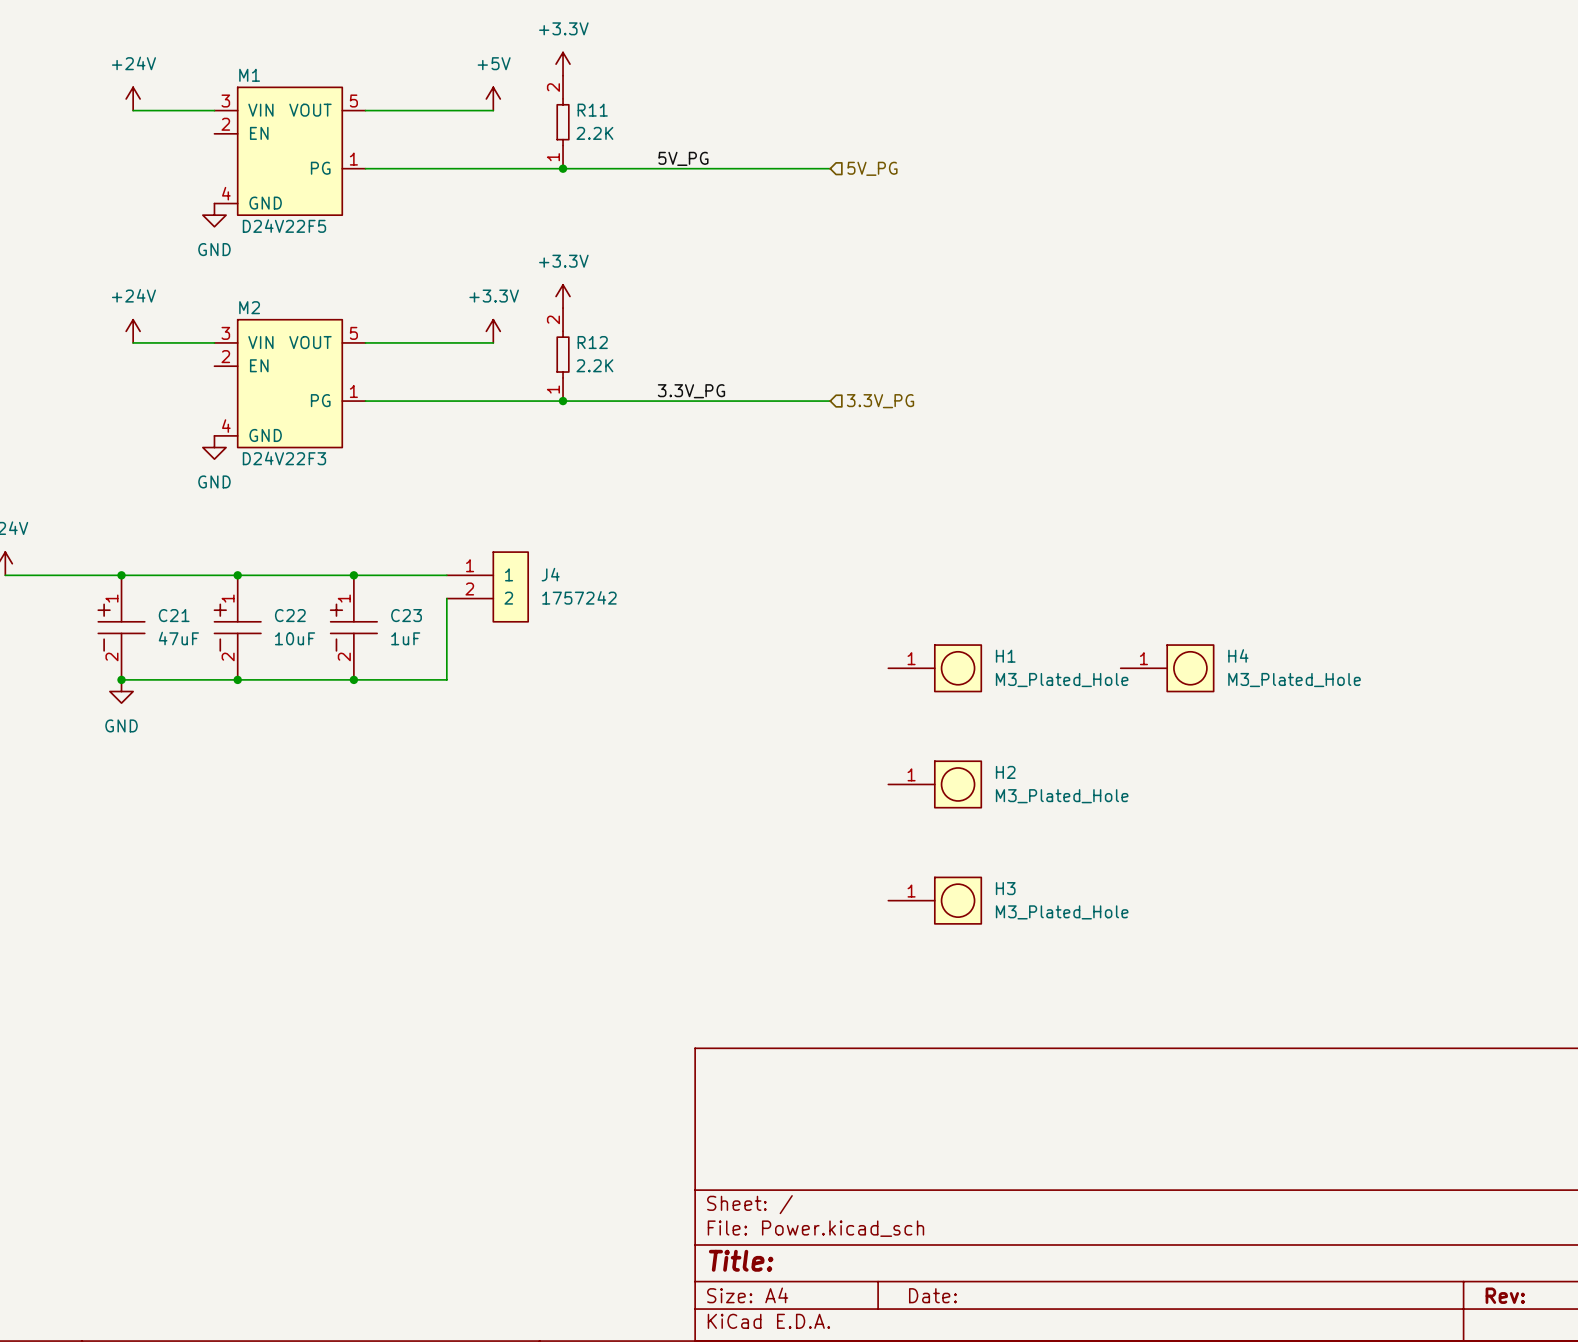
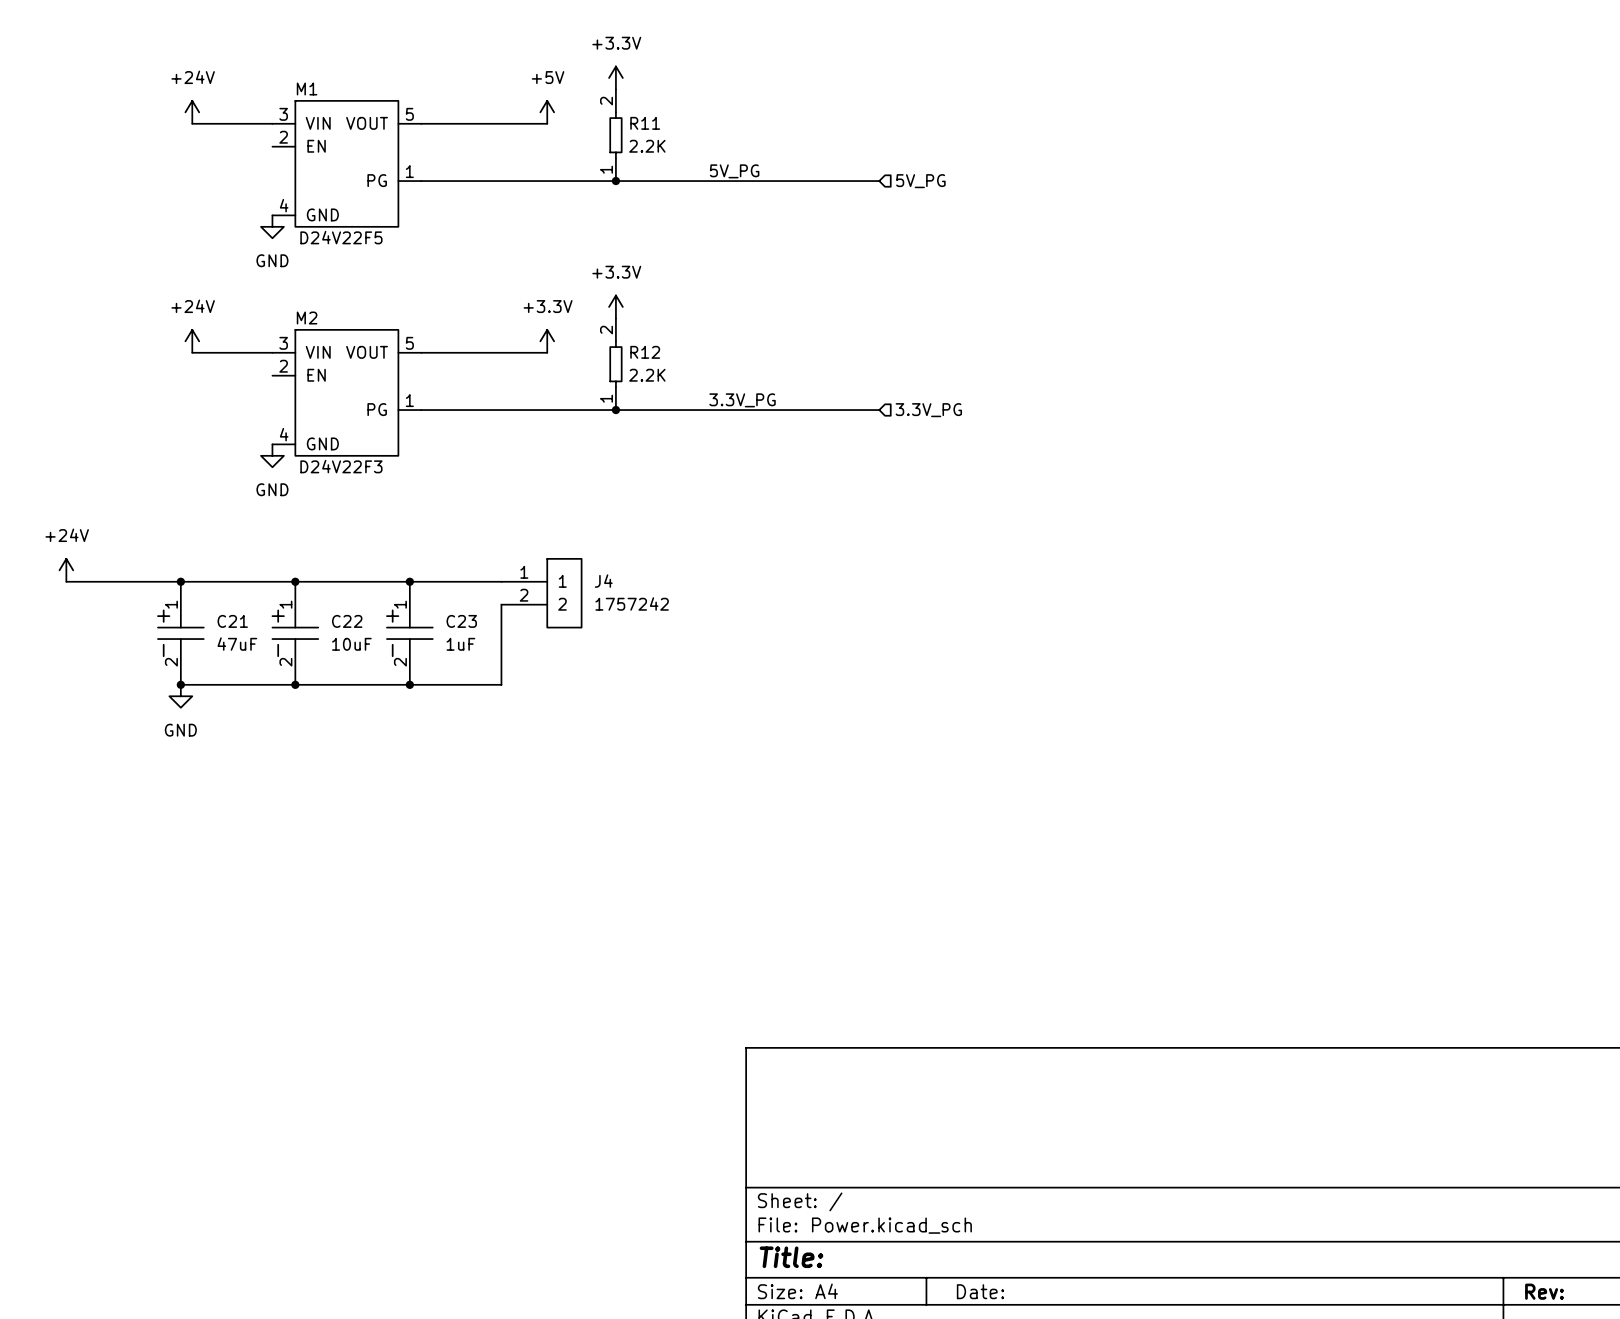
H1: M3_Plated_Hole (934, 668) -> none
H4: M3_Plated_Hole (1167, 668) -> none
H2: M3_Plated_Hole (934, 784) -> none
H3: M3_Plated_Hole (934, 900) -> none

